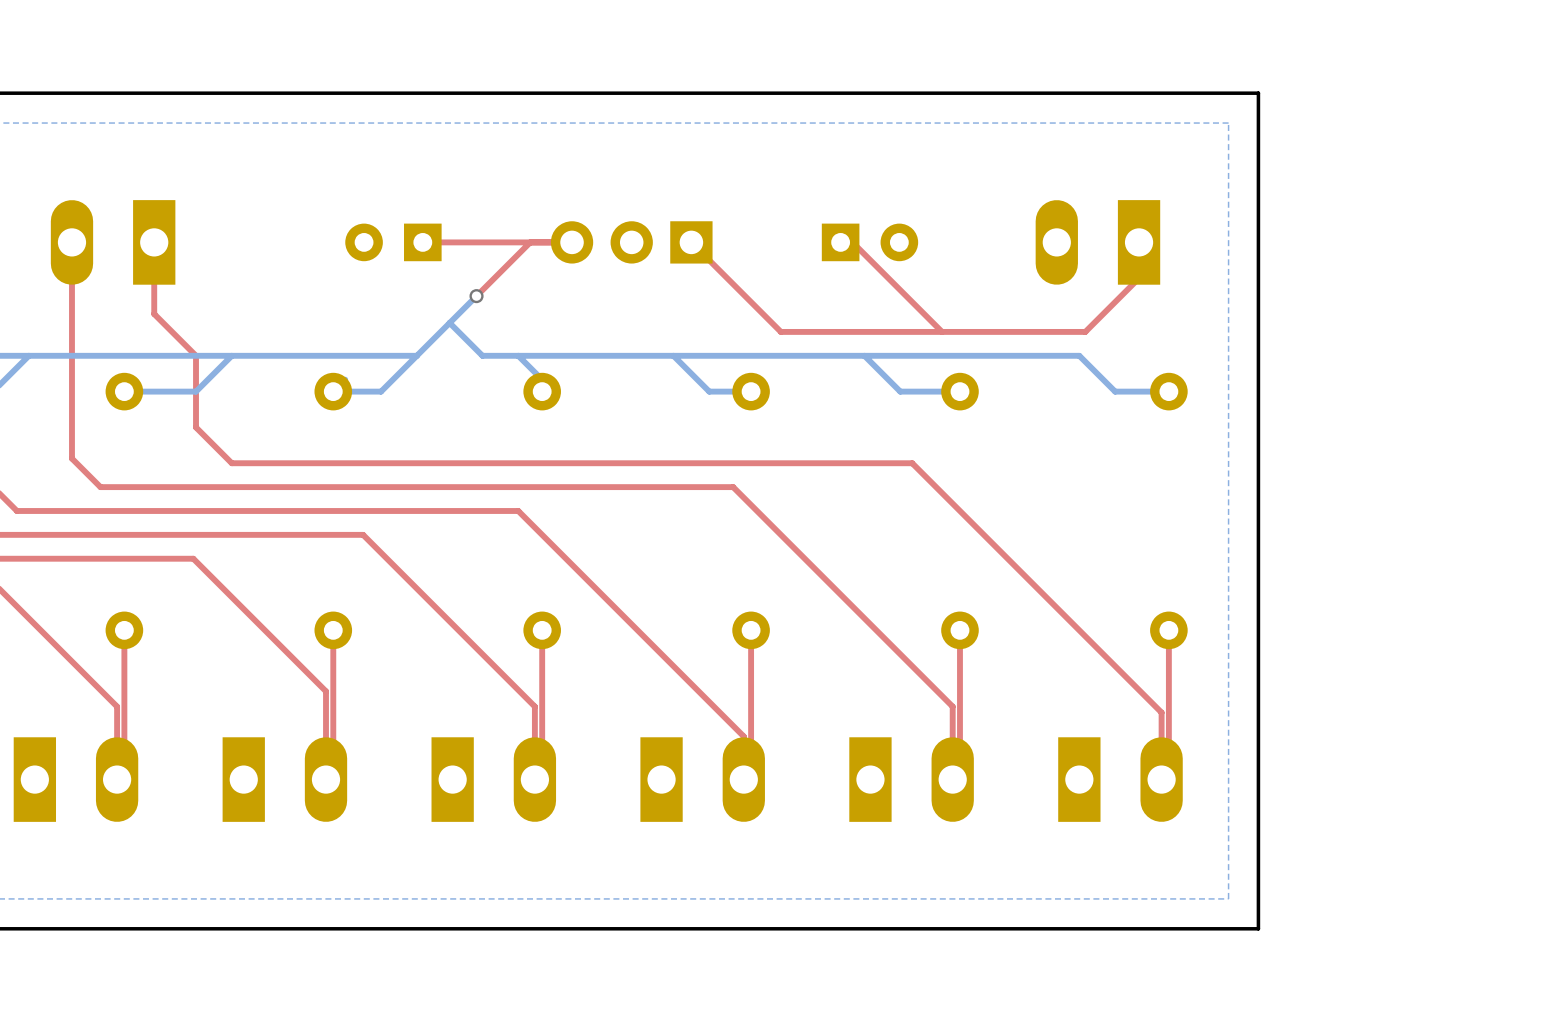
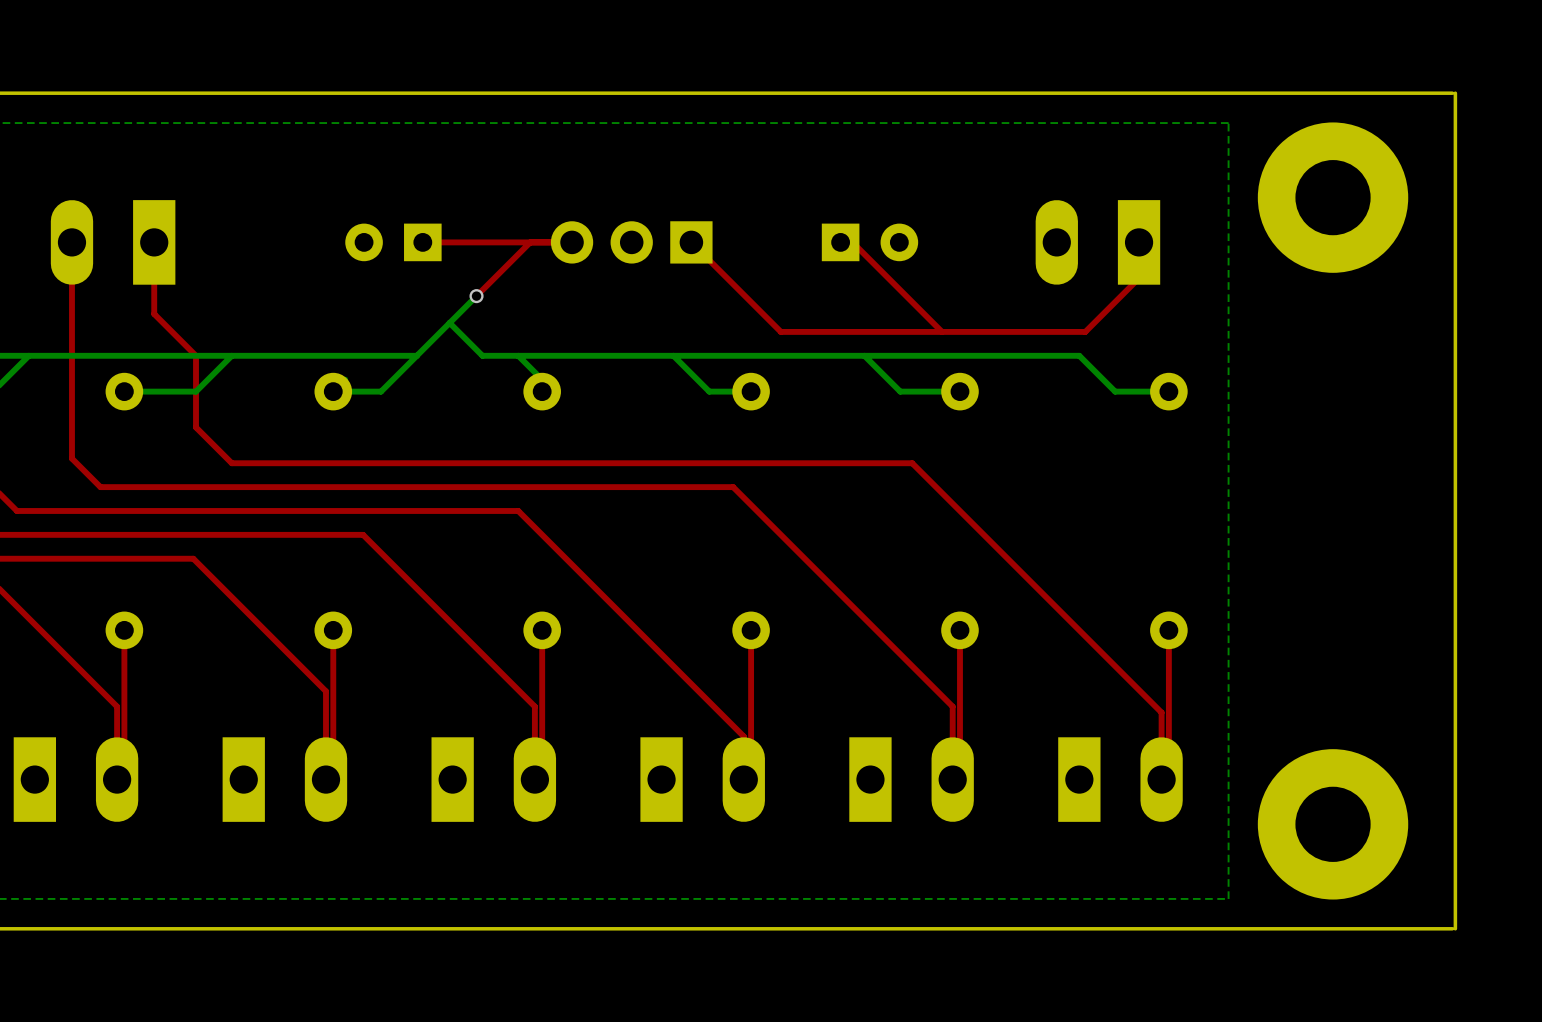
board edge: (1258, 93) (1258, 928) -> (1258, 93) (1452, 93)
board edge: none -> (1455, 93) (1455, 928)
part: none -> (1333, 197)
part: none -> (1333, 824)
board edge: none -> (1452, 928) (1258, 928)

